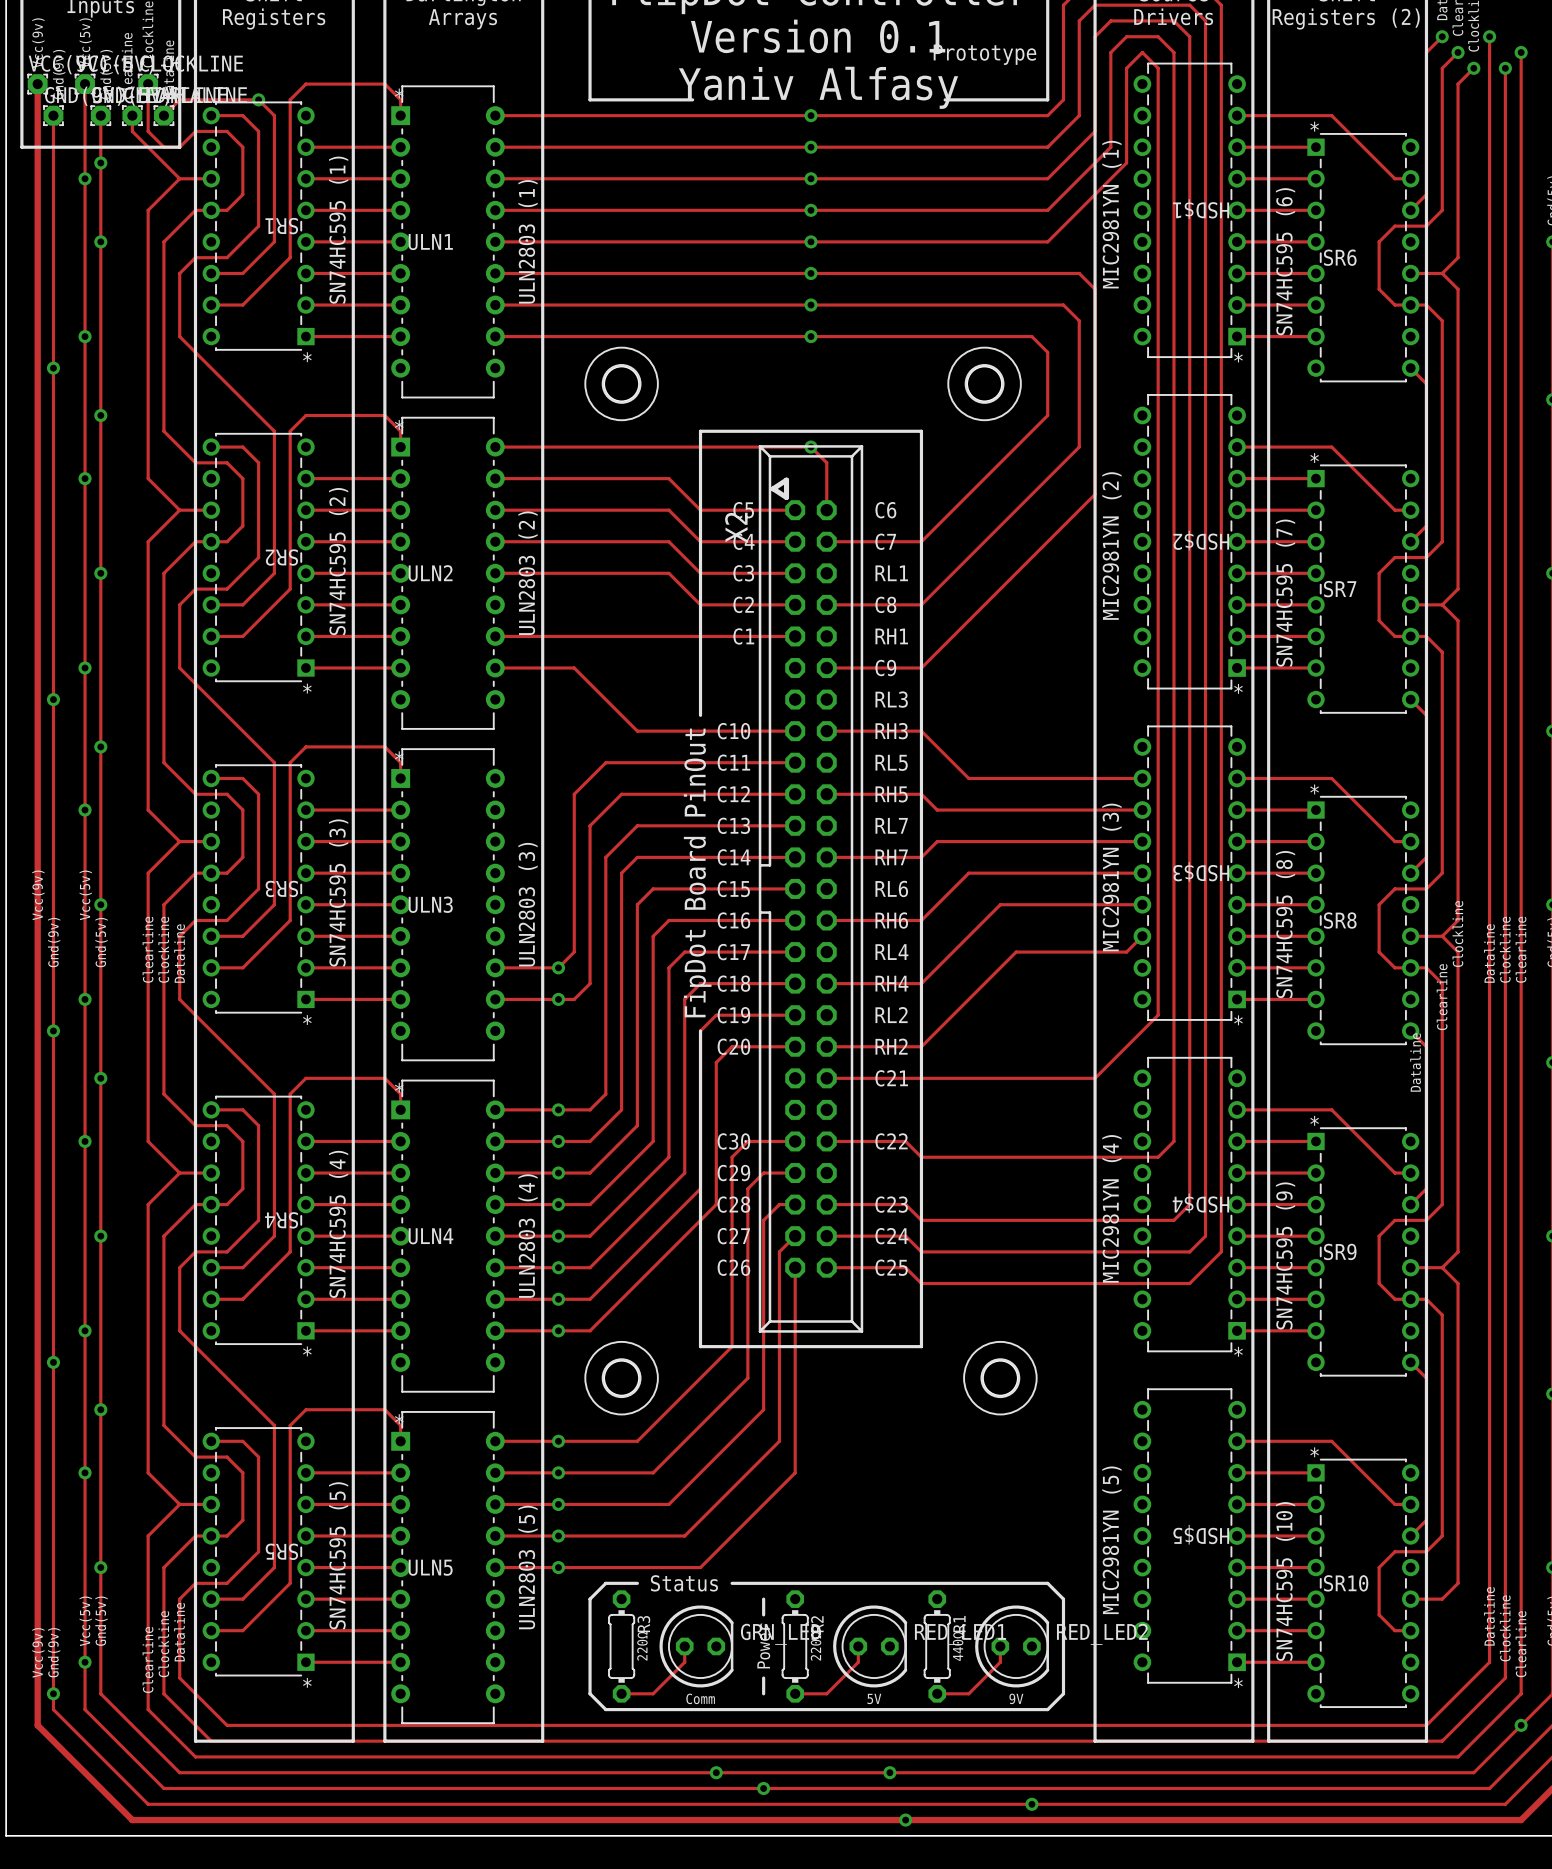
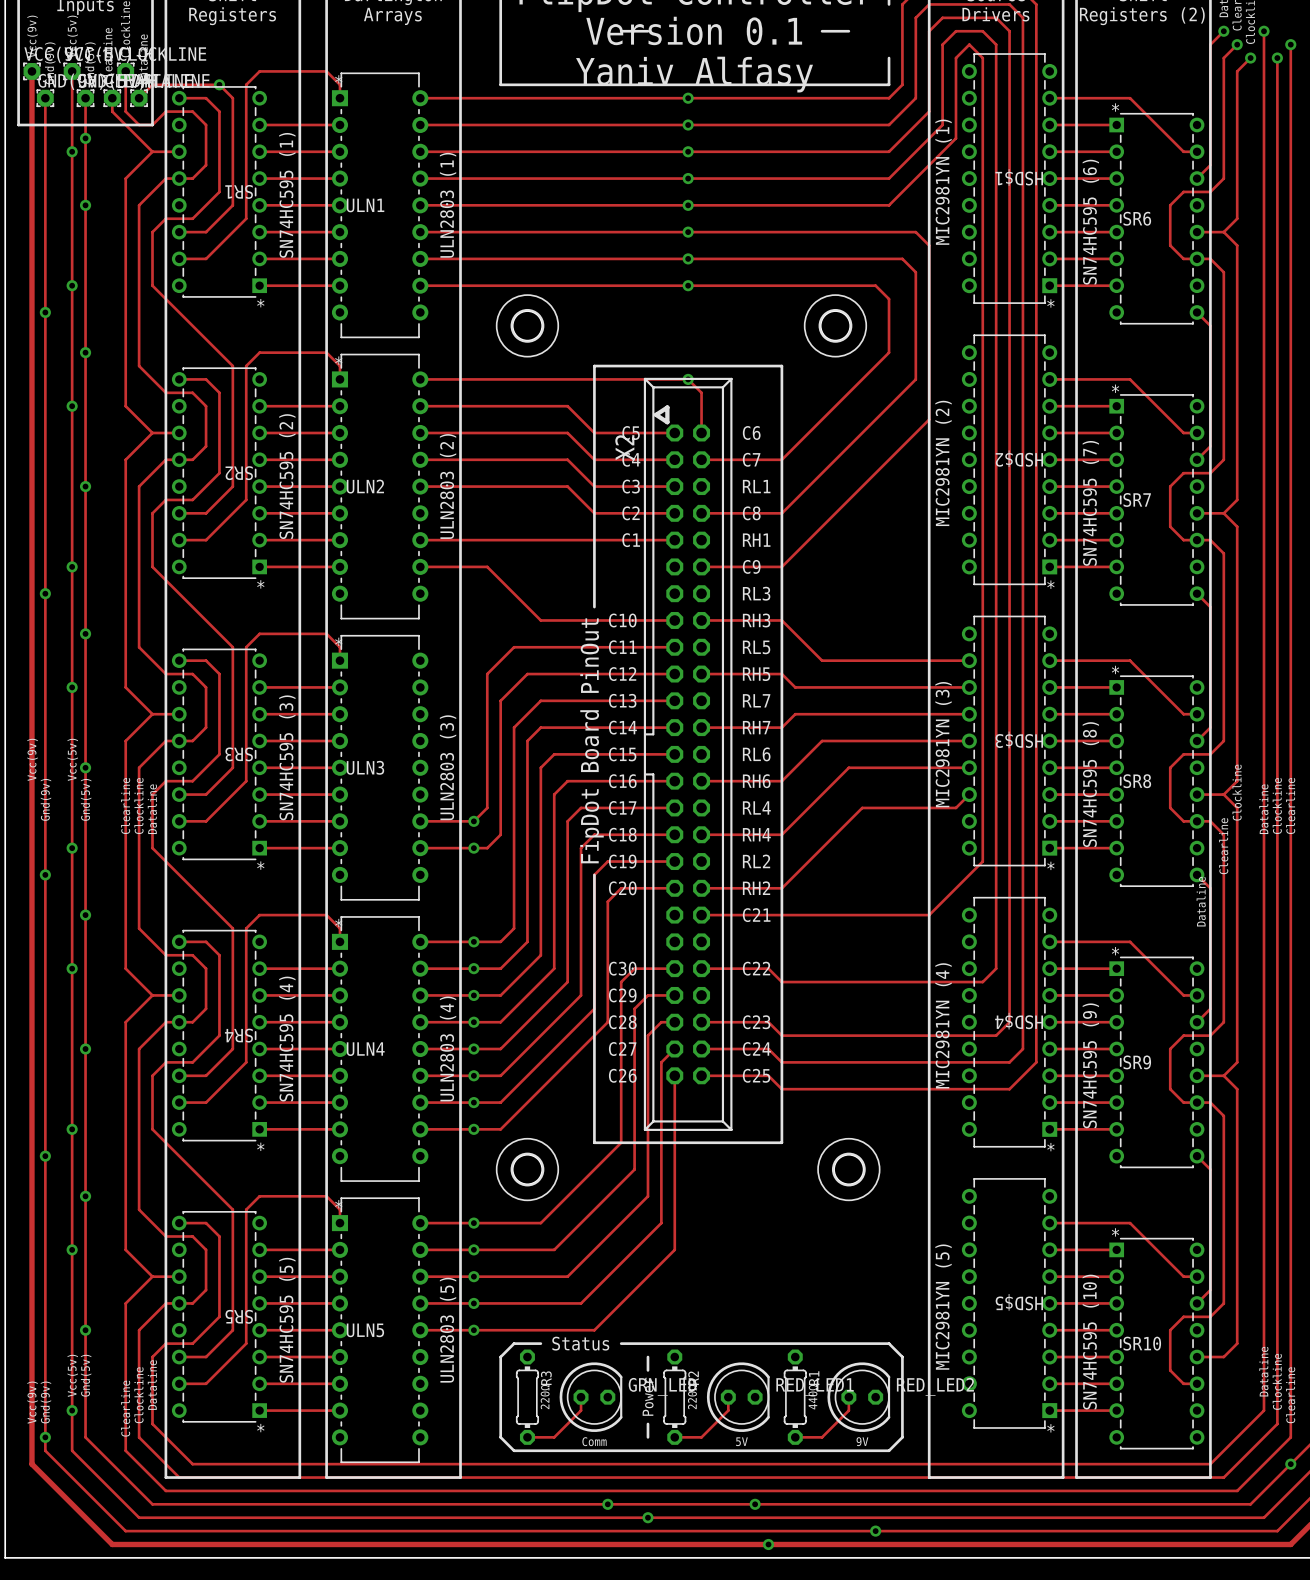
line: (1047, 5) (1047, 68) -> none
line: none -> (621, 31) (647, 31)
line: none -> (822, 31) (848, 31)
text: Prototype (984, 54) -> none
line: none -> (587, 84) (801, 84)

